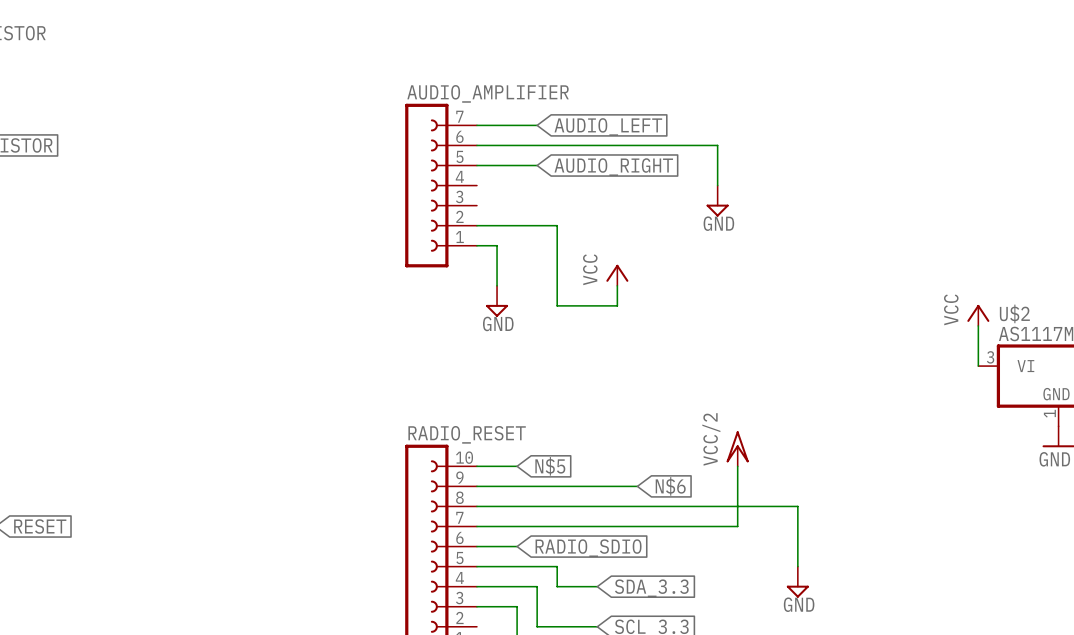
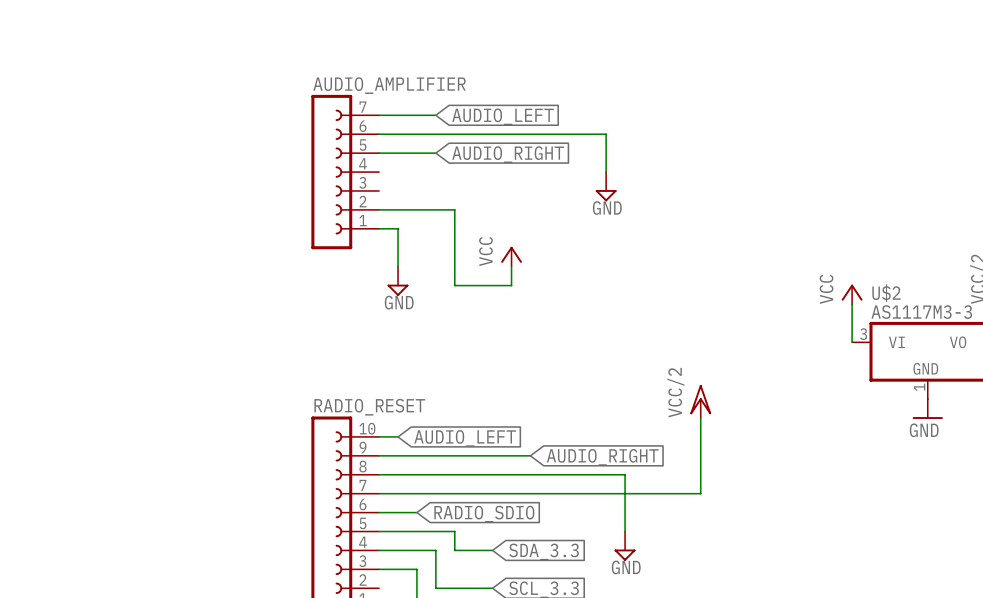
wire: none -> (700, 418) (700, 493) (625, 493) (625, 531)
power symbol position: VCC/2 (737, 448) -> VCC/2 (700, 401)
wire: (497, 466) (517, 466) -> none
global label: N$5 (550, 466) -> none
wire: (737, 466) (737, 506) (797, 506) (797, 566) -> none
global label: none -> AUDIO_LEFT (465, 438)
global label: N$6 (670, 486) -> AUDIO_RIGHT (602, 457)
power symbol position: GND (797, 582) -> GND (625, 546)

